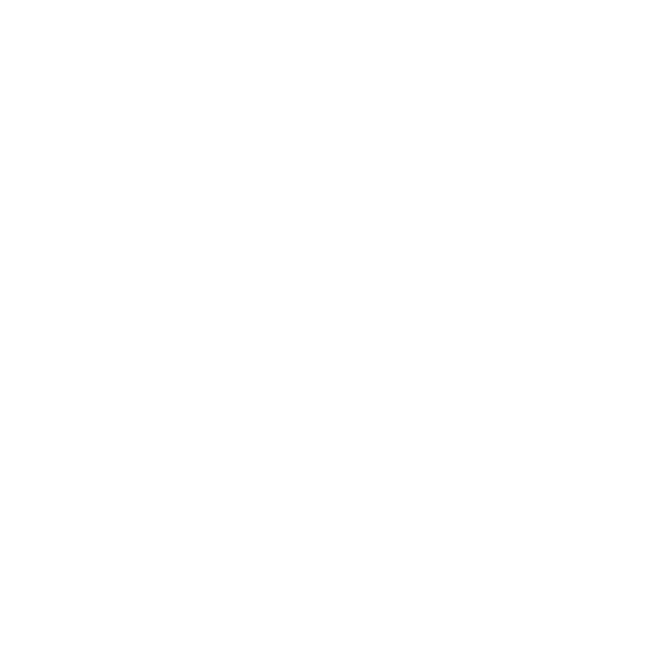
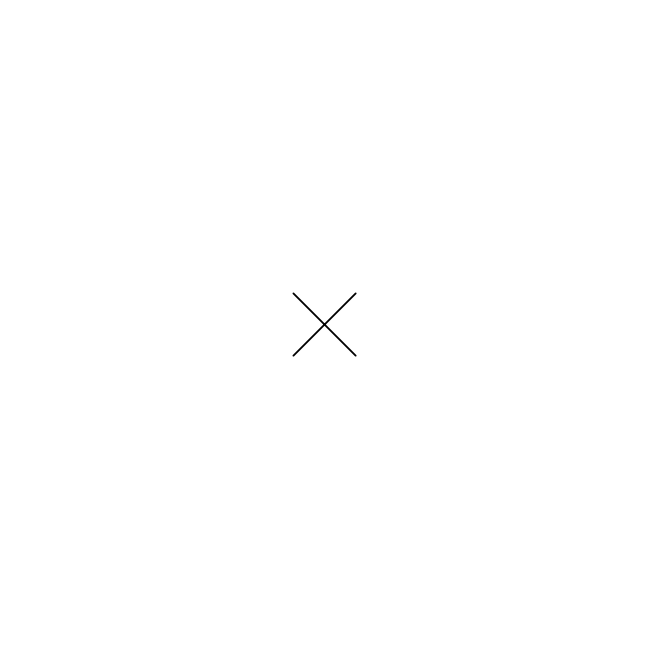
no-connect mark: none -> (324, 324)

